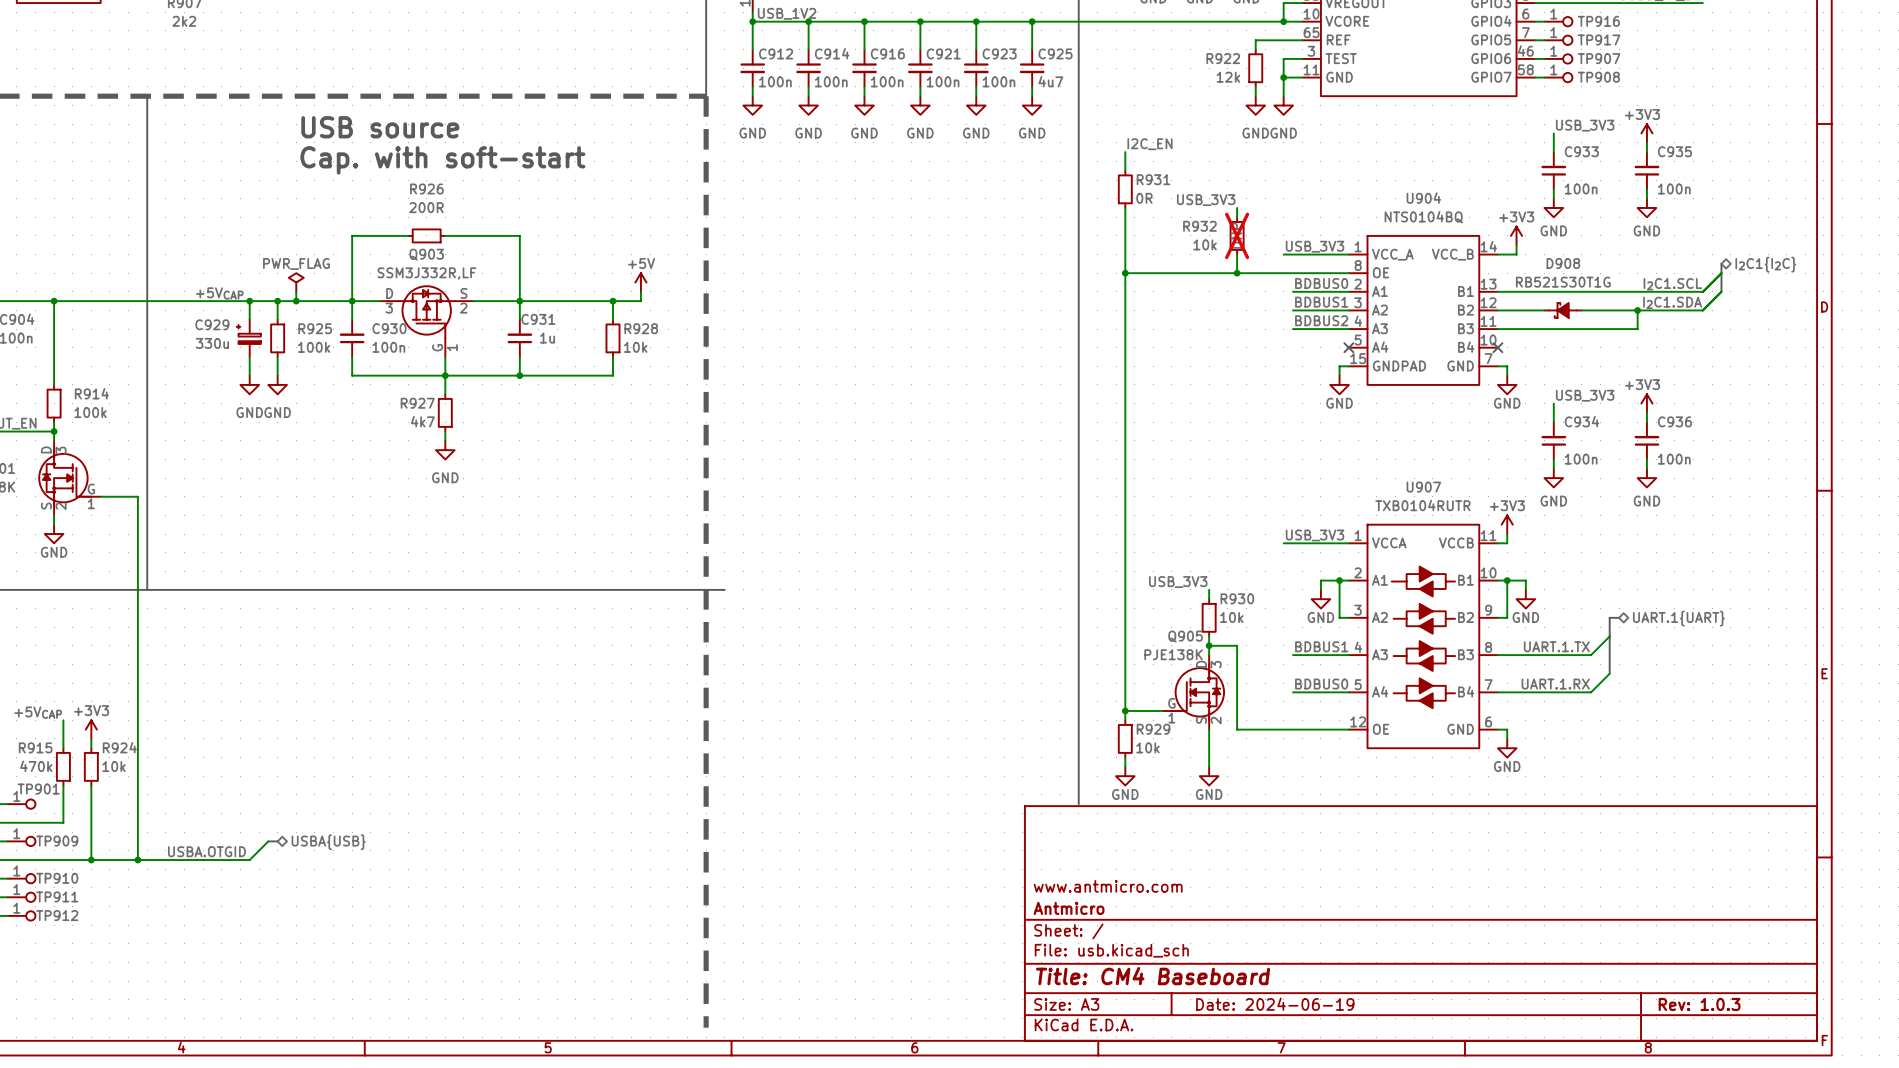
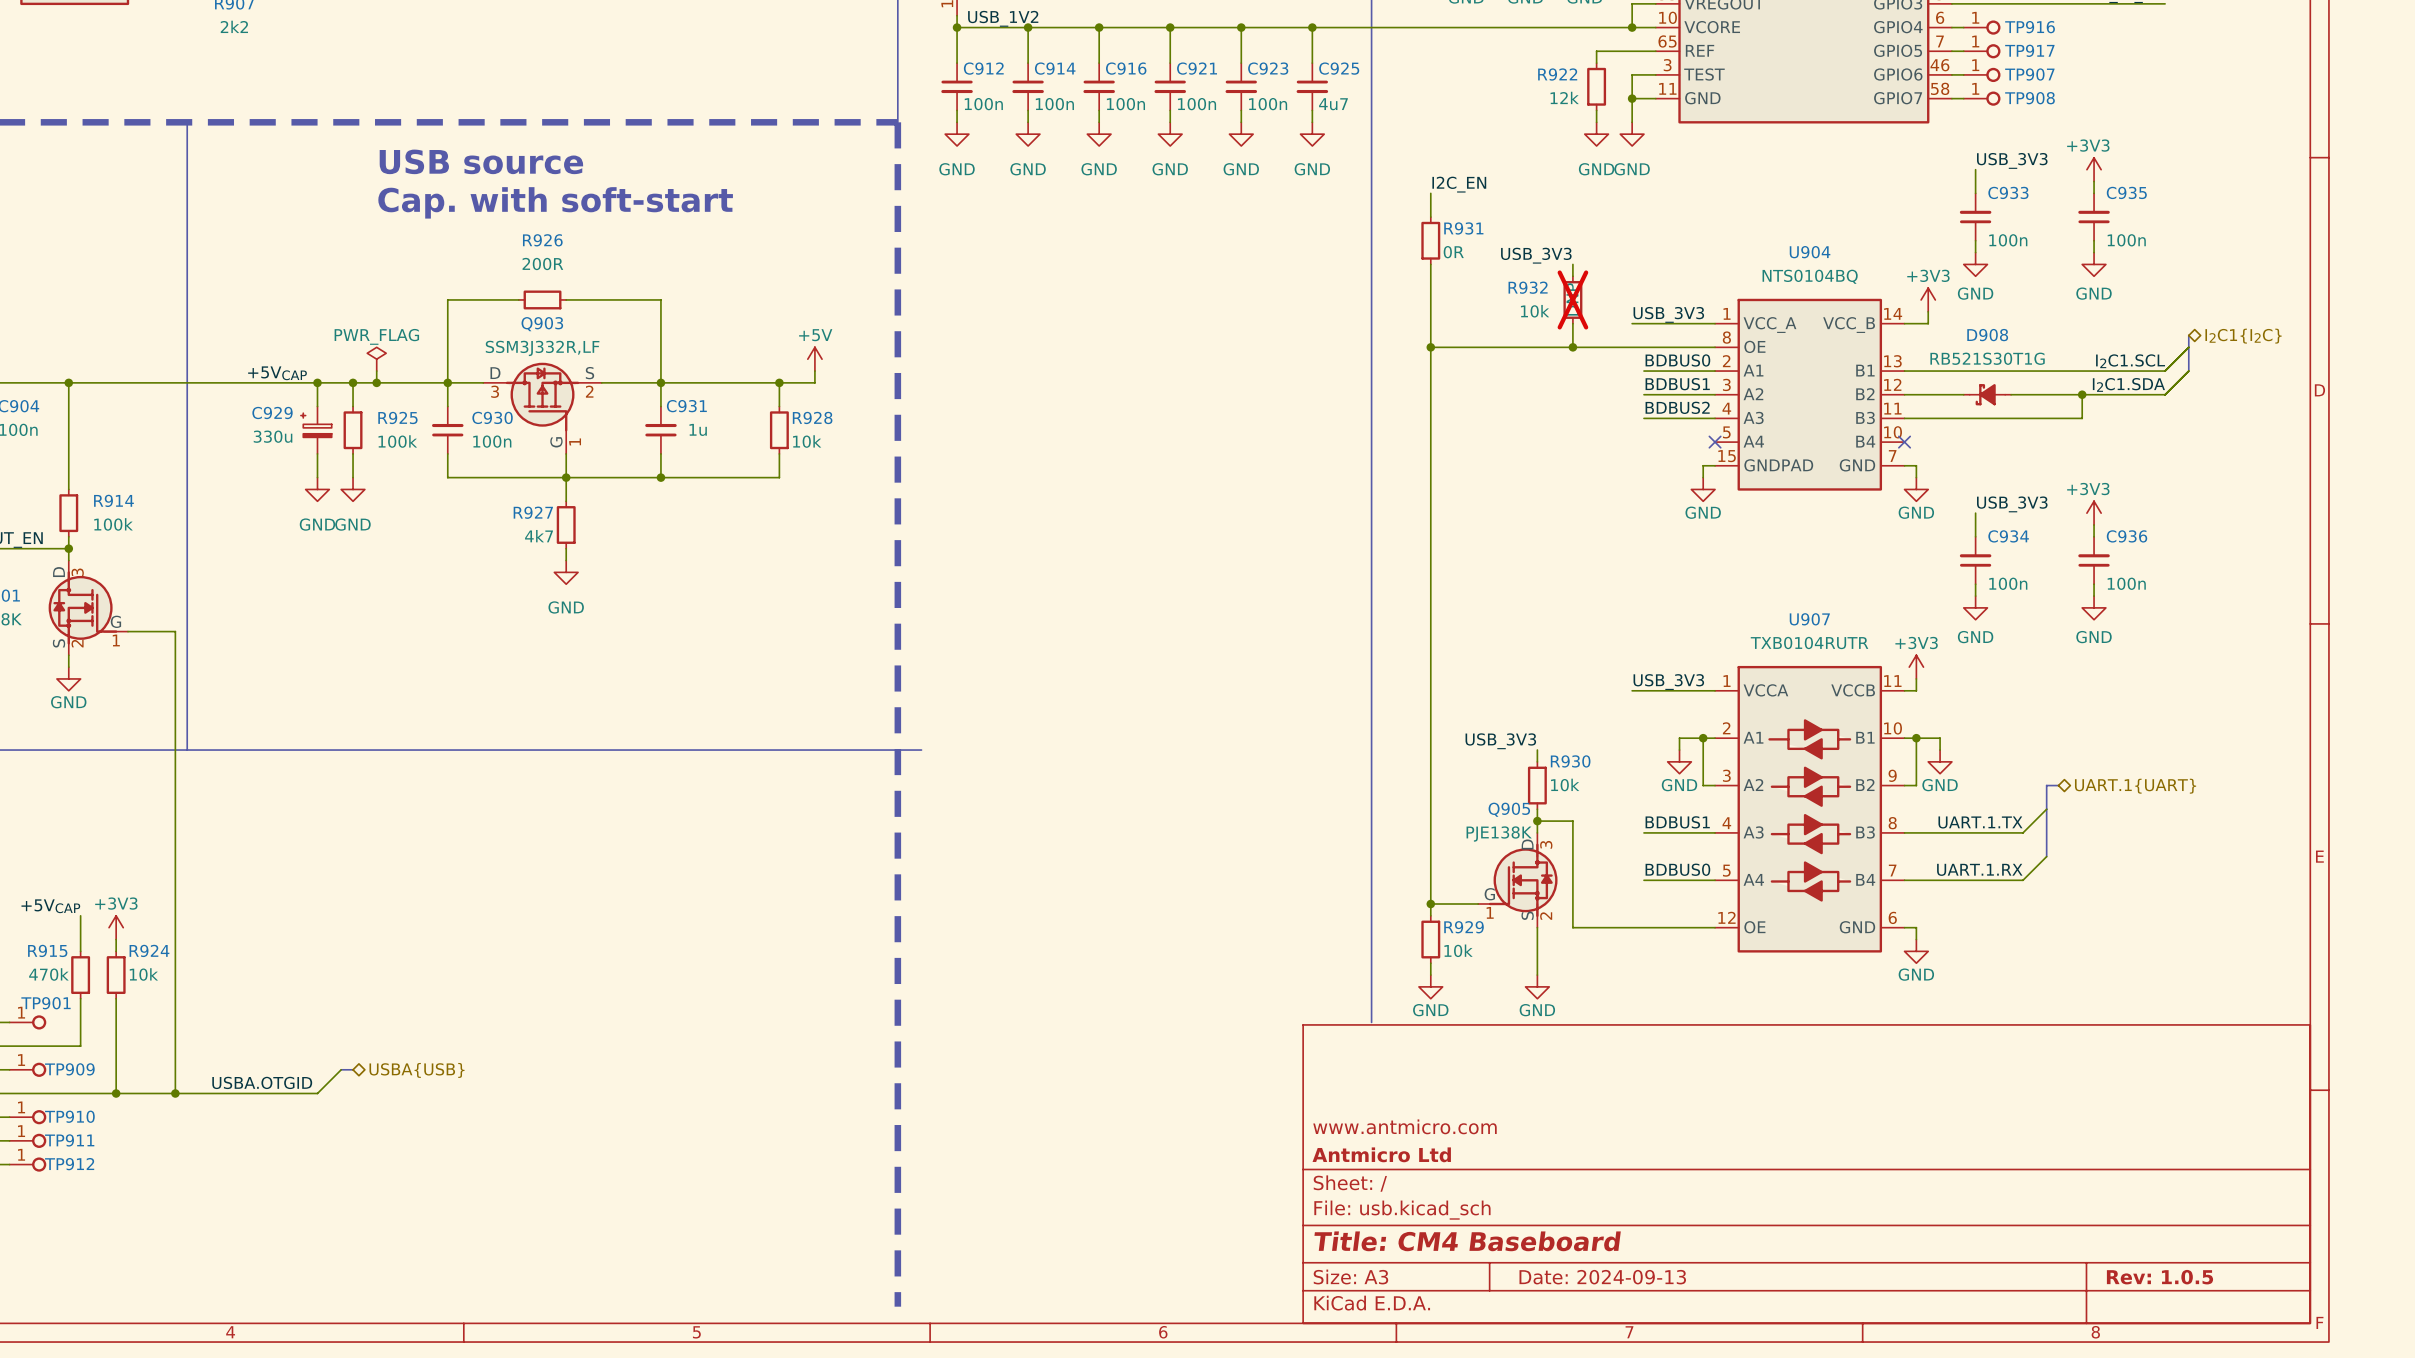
title block: Antmicro (1069, 908) -> Antmicro Ltd (1381, 1154)
title block: Date: 2024-06-19 (1275, 1004) -> Date: 2024-09-13 (1602, 1277)
title block: Rev: 1.0.3 (1699, 1004) -> Rev: 1.0.5 (2159, 1277)

